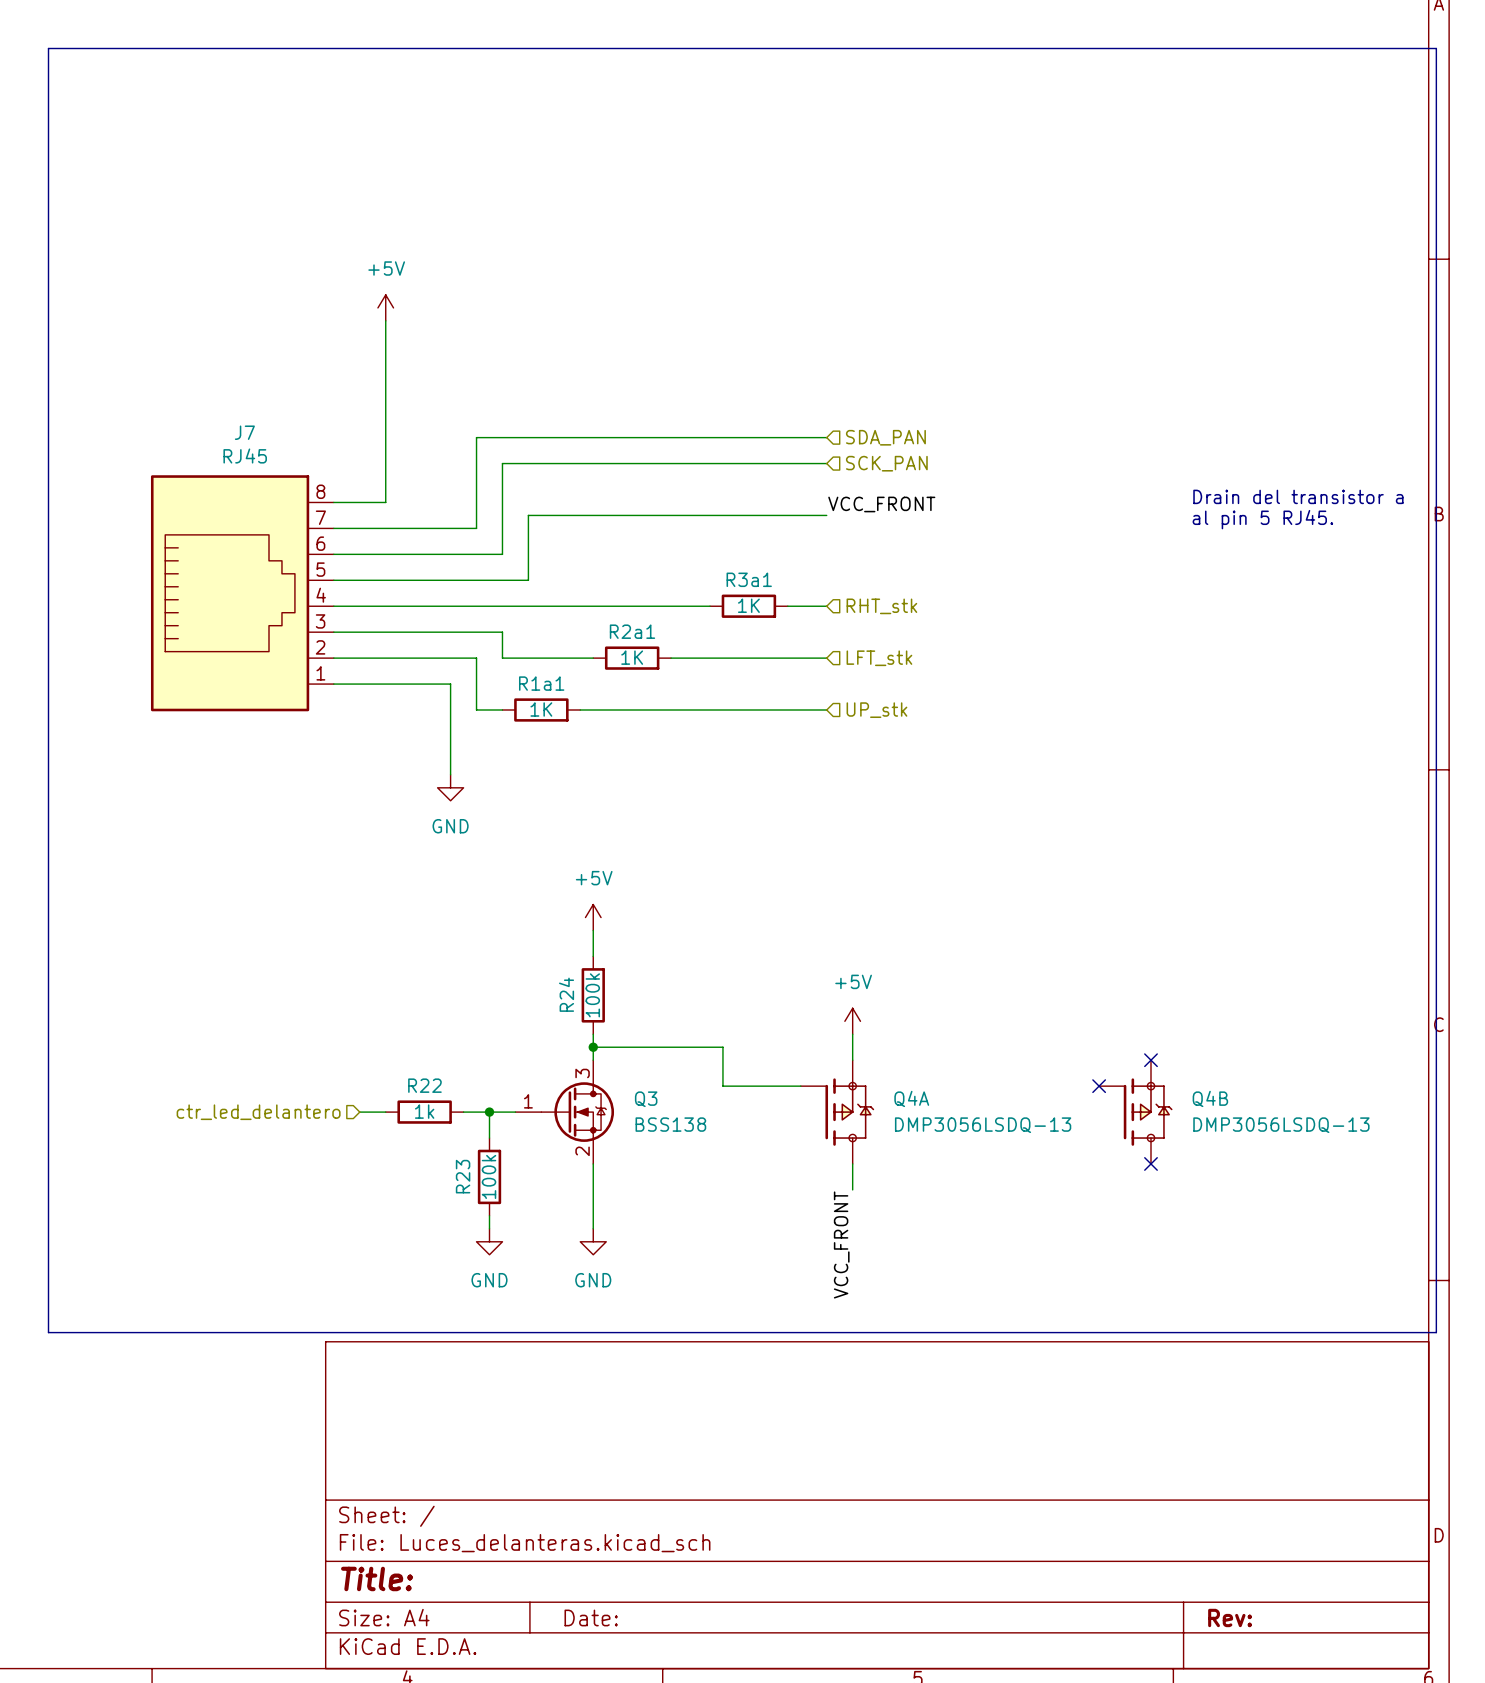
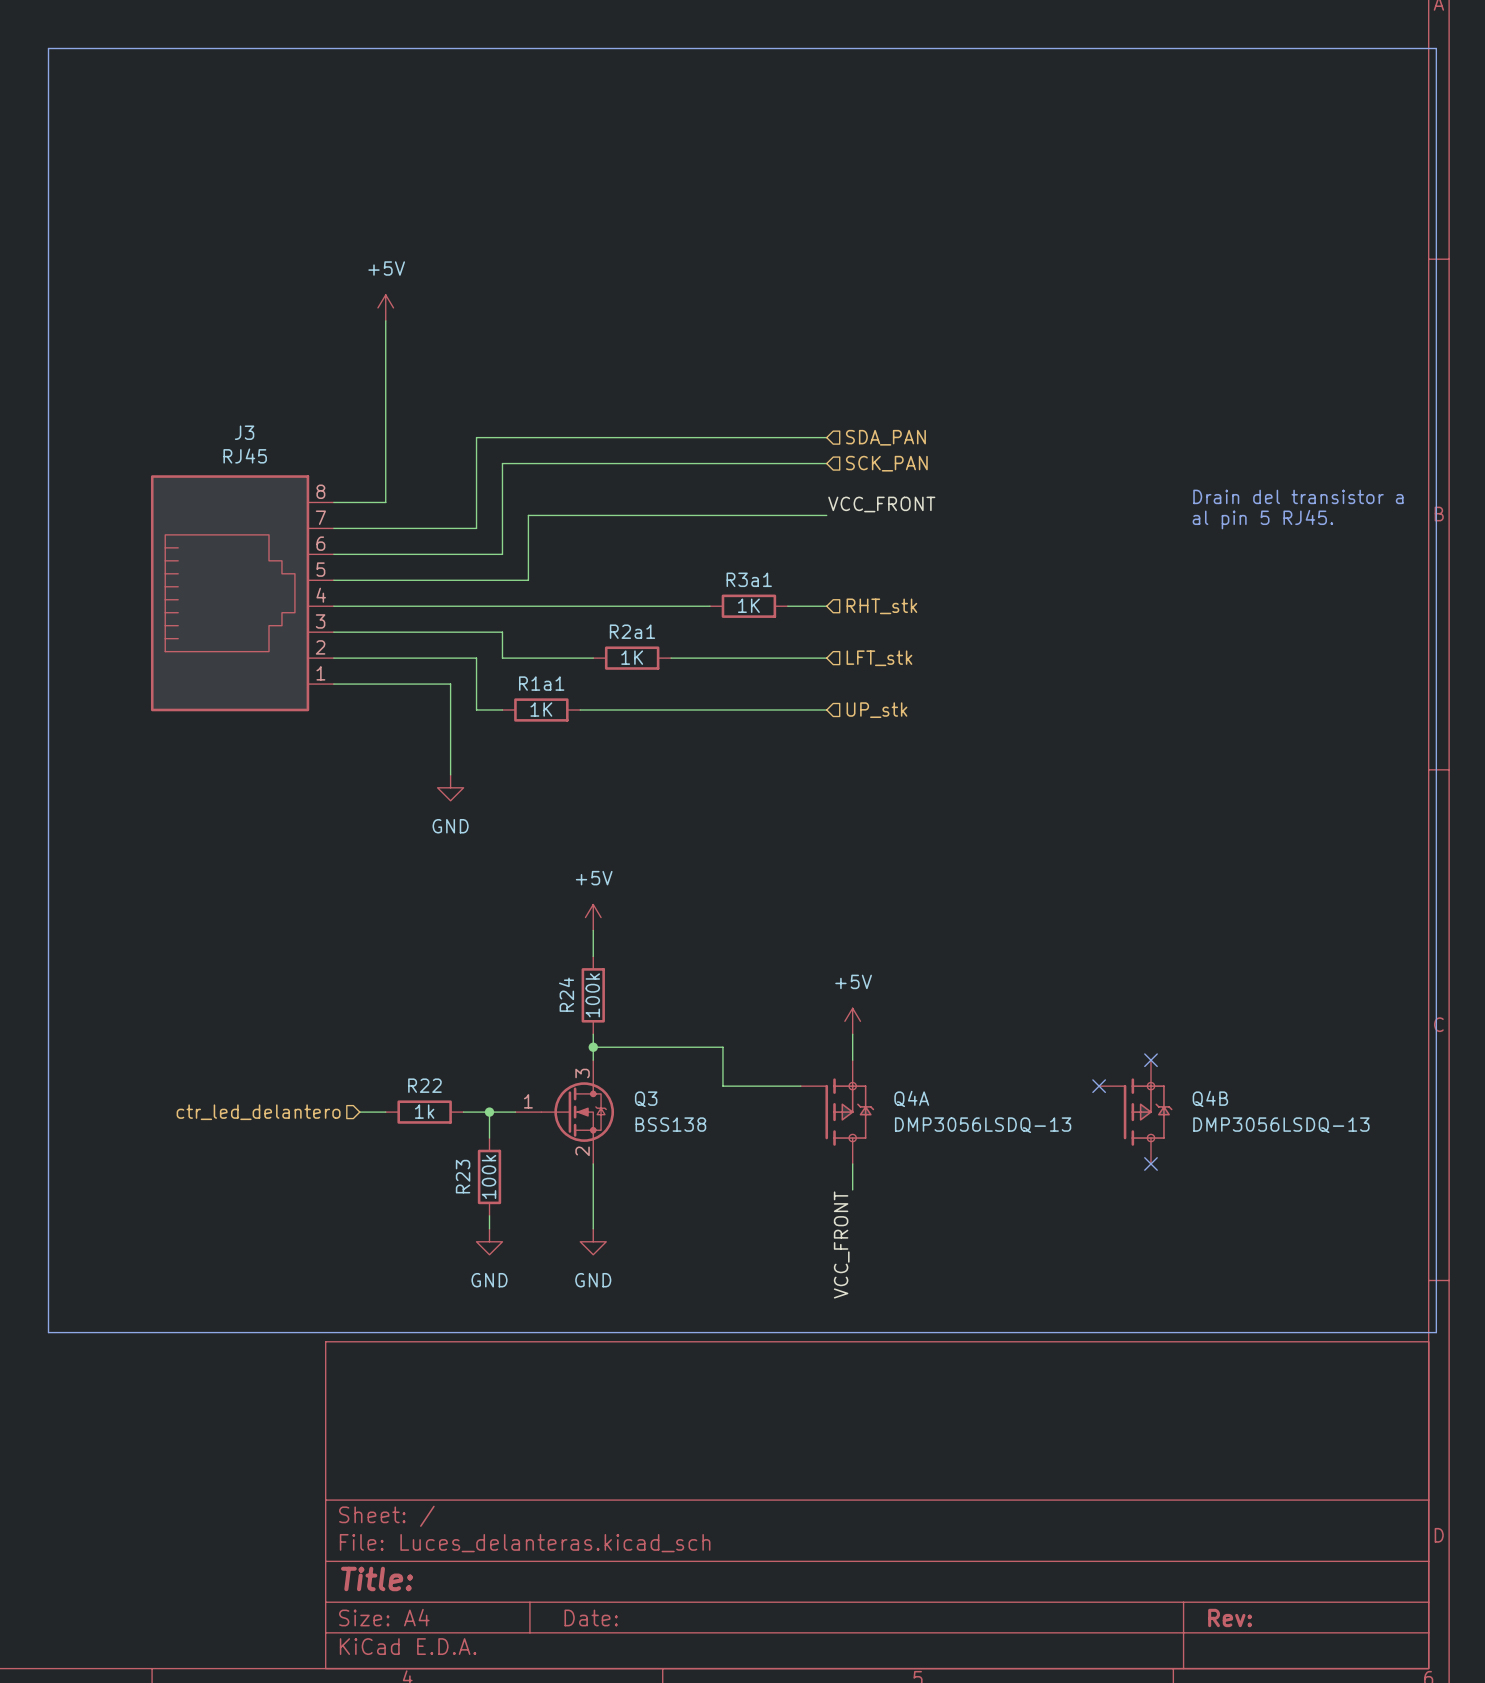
J7 name: J7 (244, 432) -> J3 (244, 432)

